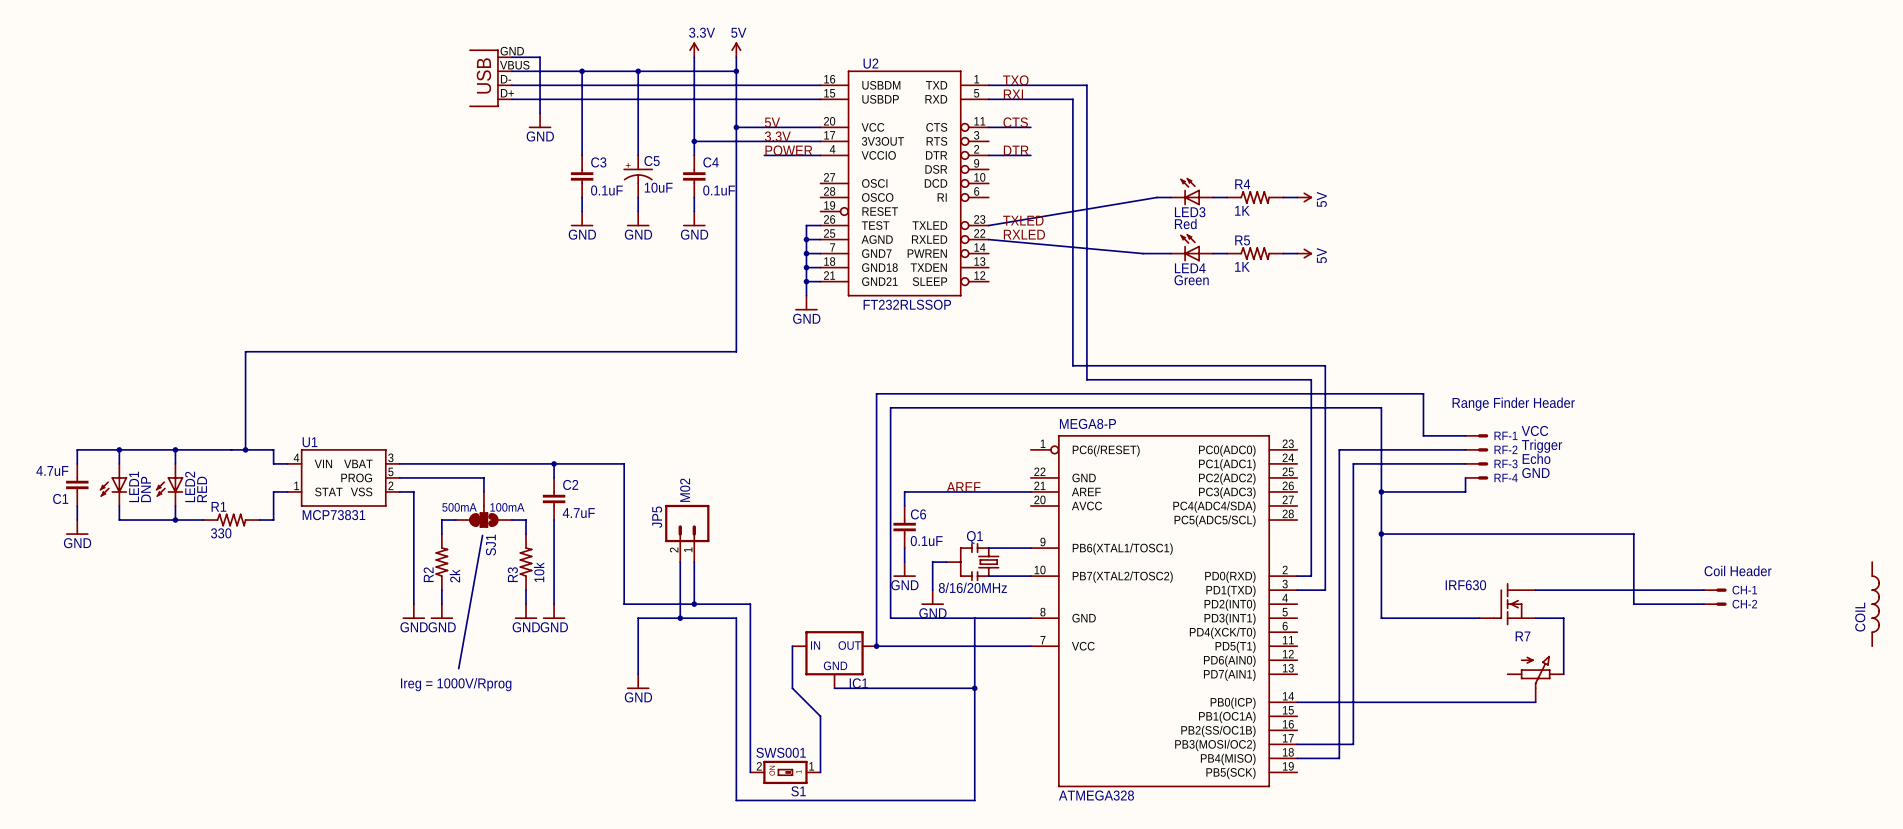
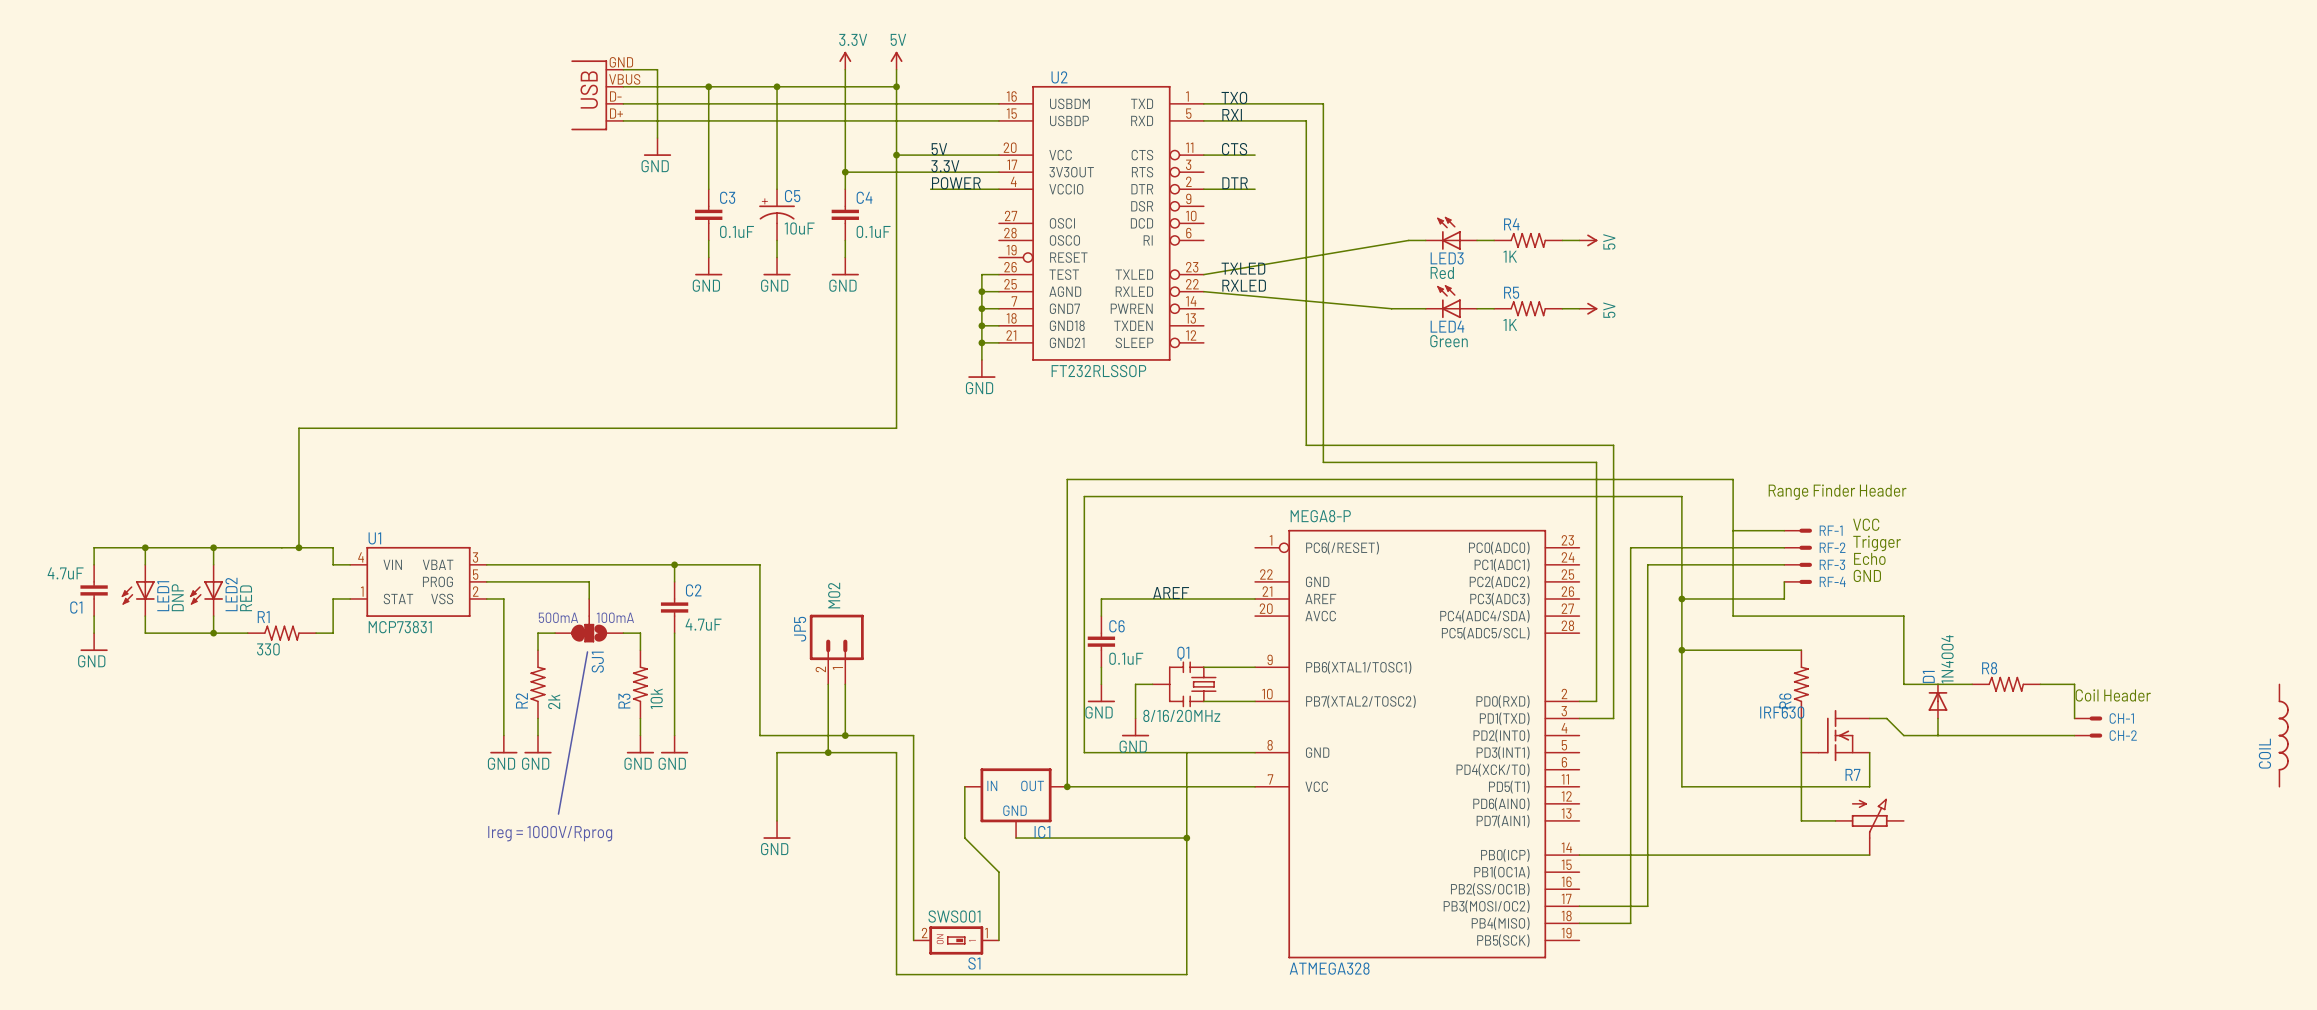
wire: none -> (1733, 530) (1733, 616) (1903, 616) (1903, 684) (1972, 684)
wire: (1479, 534) (1633, 534) (1633, 604) -> none
R6: none -> (1801, 684)
R8: none -> (2006, 684)
wire: none -> (2040, 684) (2074, 684) (2074, 718)
D1: none -> 1N4004 (1937, 701)
wire: none -> (1801, 718) (1801, 820) (1835, 820)
wire: (1549, 590) (1703, 590) -> (1886, 718) (1903, 735) (1989, 735)
wire: none -> (1937, 718) (1937, 735)
wire: (1381, 618) (1479, 618) -> (1681, 752) (1681, 786) (1869, 786) (1869, 752)
wire: (1535, 618) (1563, 618) (1563, 674) -> none

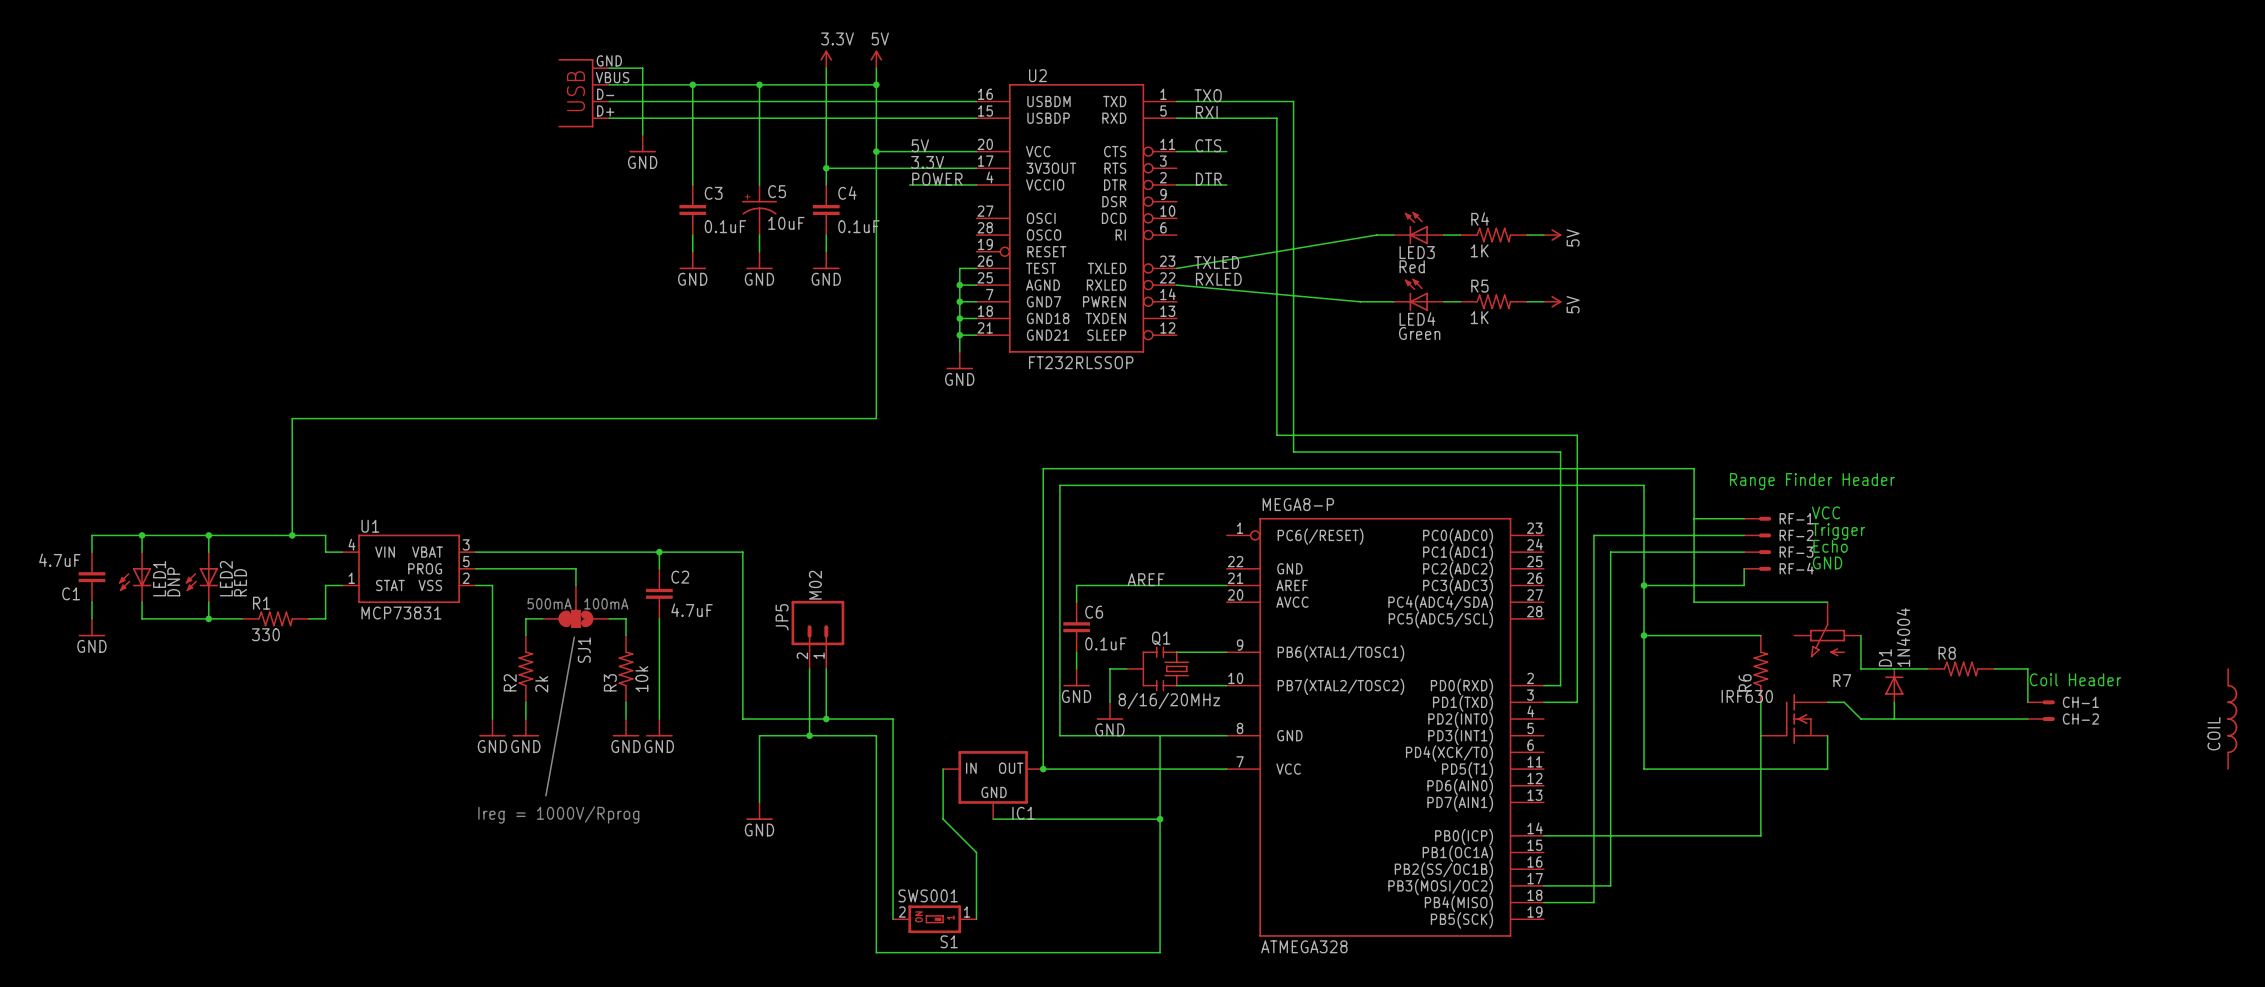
wire: (1869, 616) (1903, 616) (1903, 650) -> none
R7 rotation: 0° (1869, 818) -> 180° (1827, 637)
wire: (1801, 820) (1835, 820) -> (1760, 802) (1760, 835)
R7 position: (1869, 827) -> (1827, 629)
wire: (1801, 855) (1869, 855) -> none

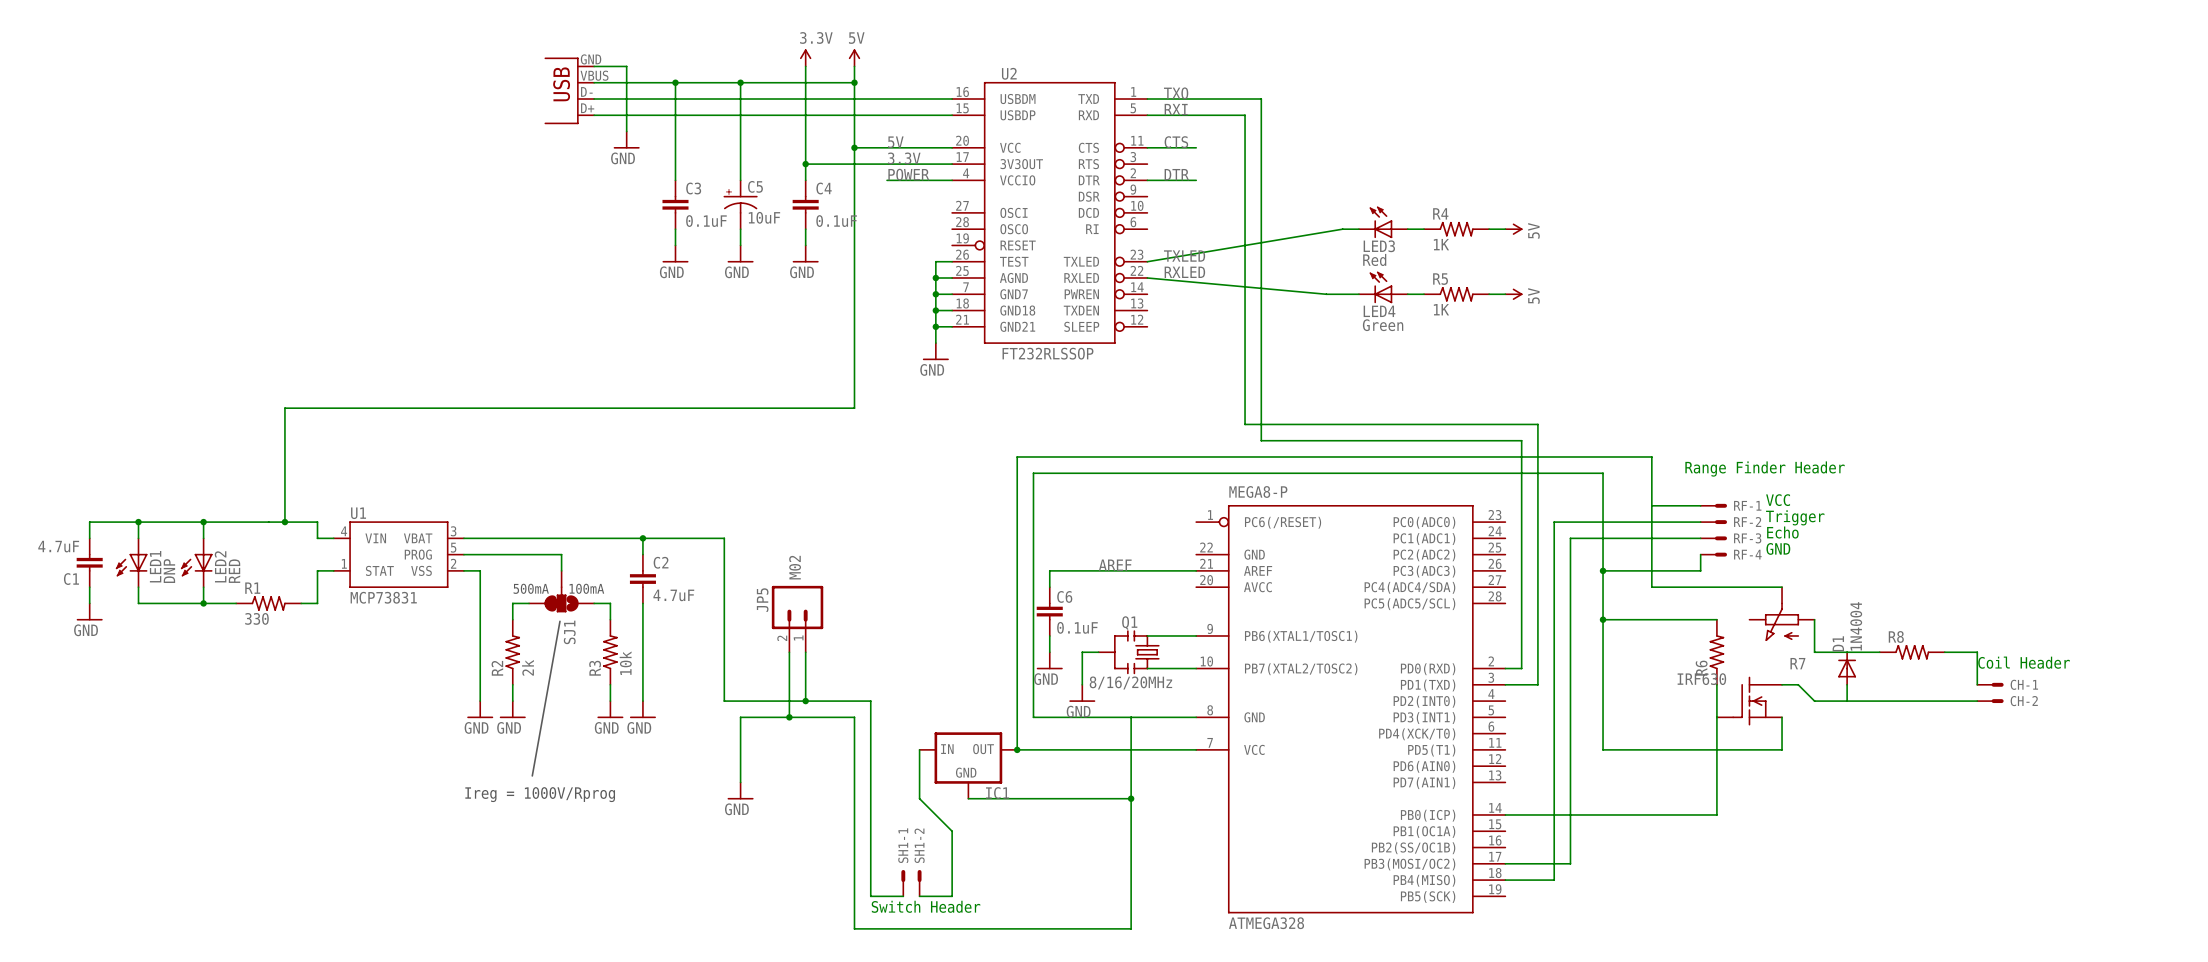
COIL: (2232, 719) -> none
SH1-1: none -> (903, 883)
SH1-2: none -> (919, 883)
S1: SWS001 (934, 919) -> none
text: none -> Switch Header (926, 906)

